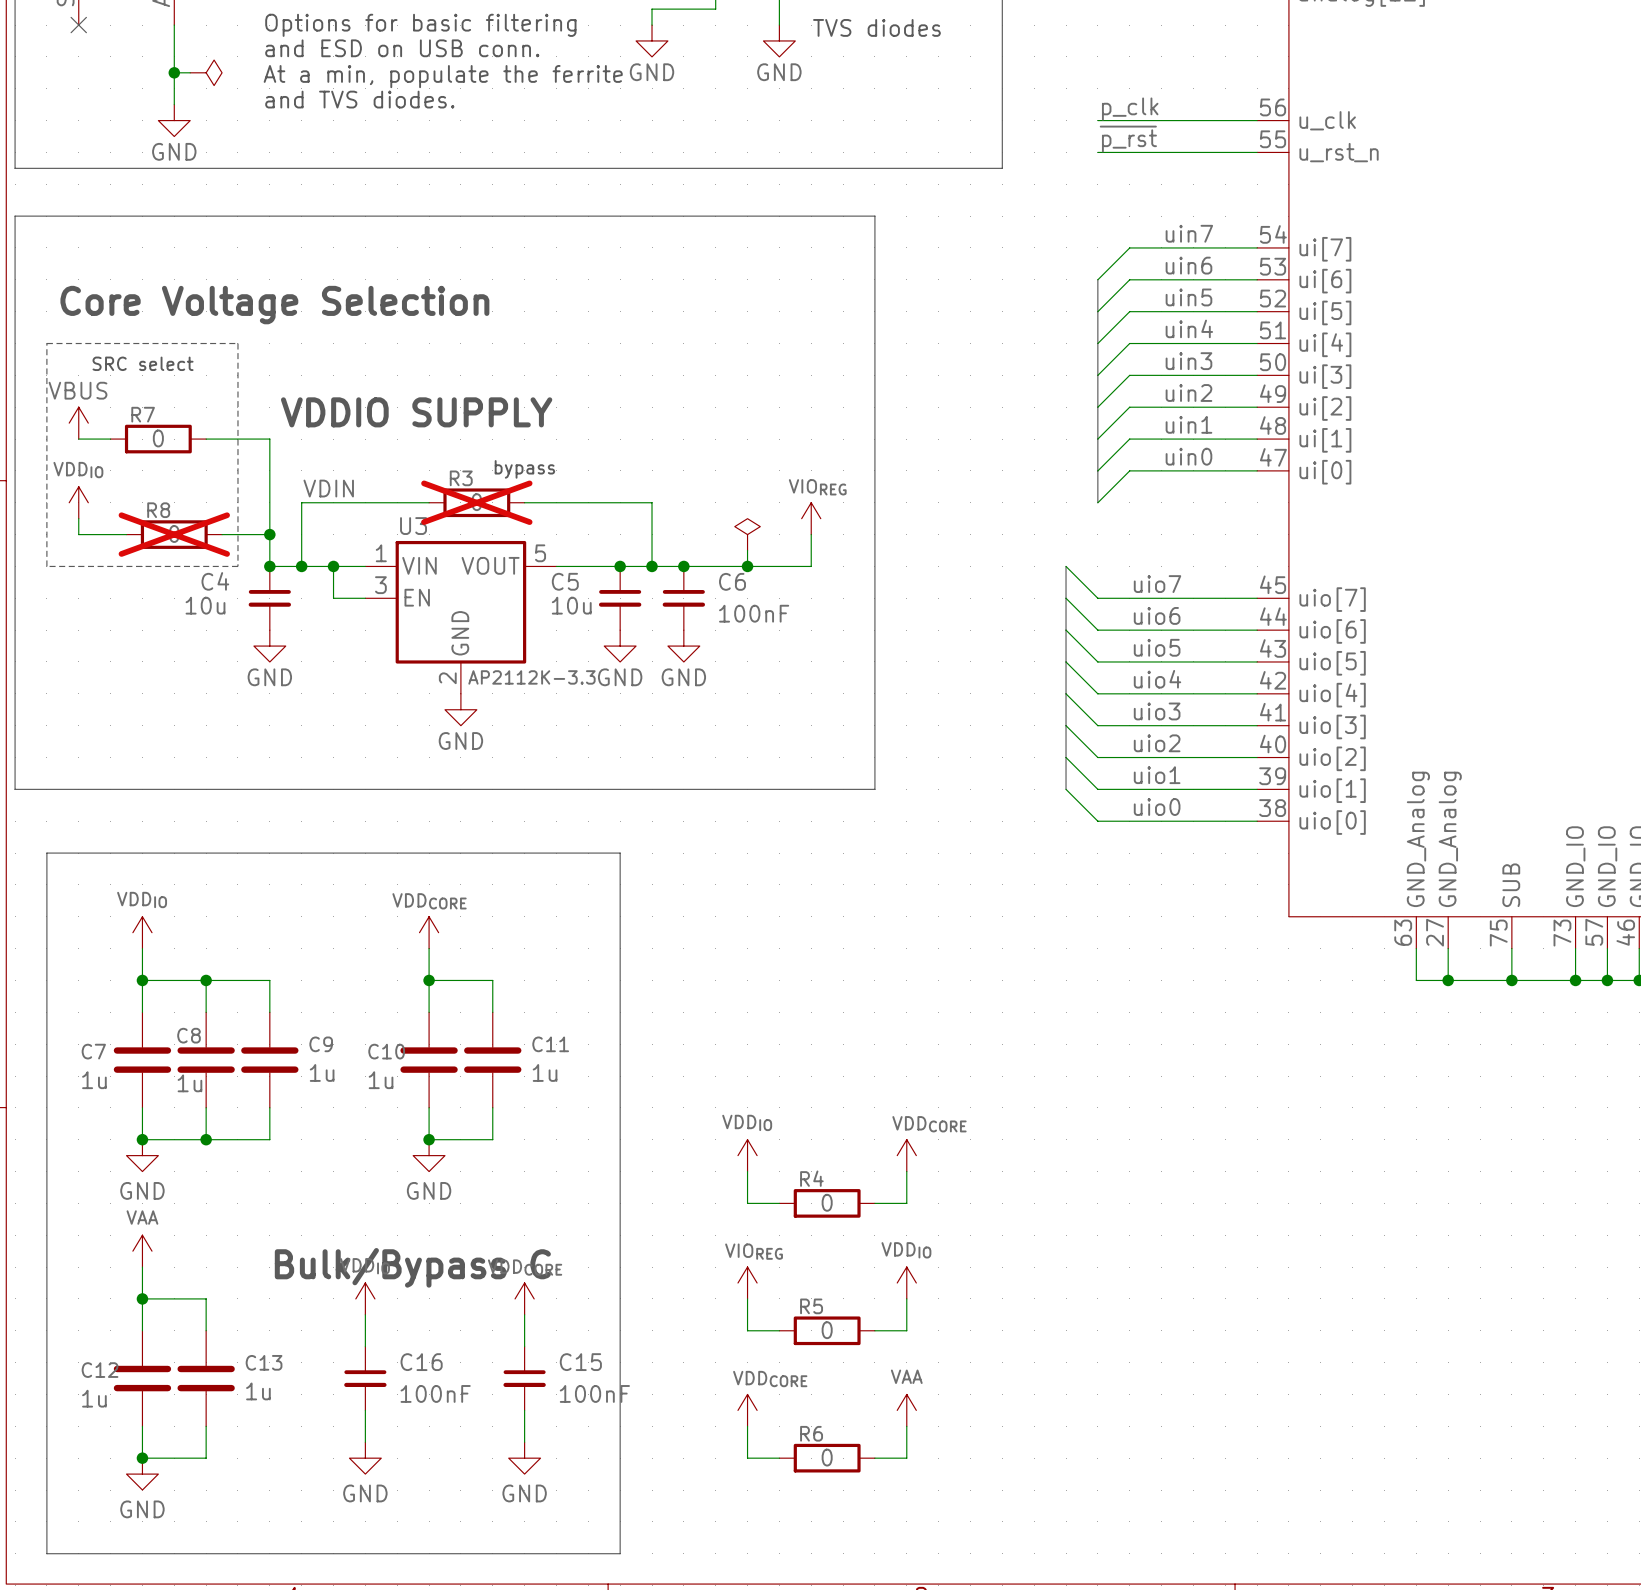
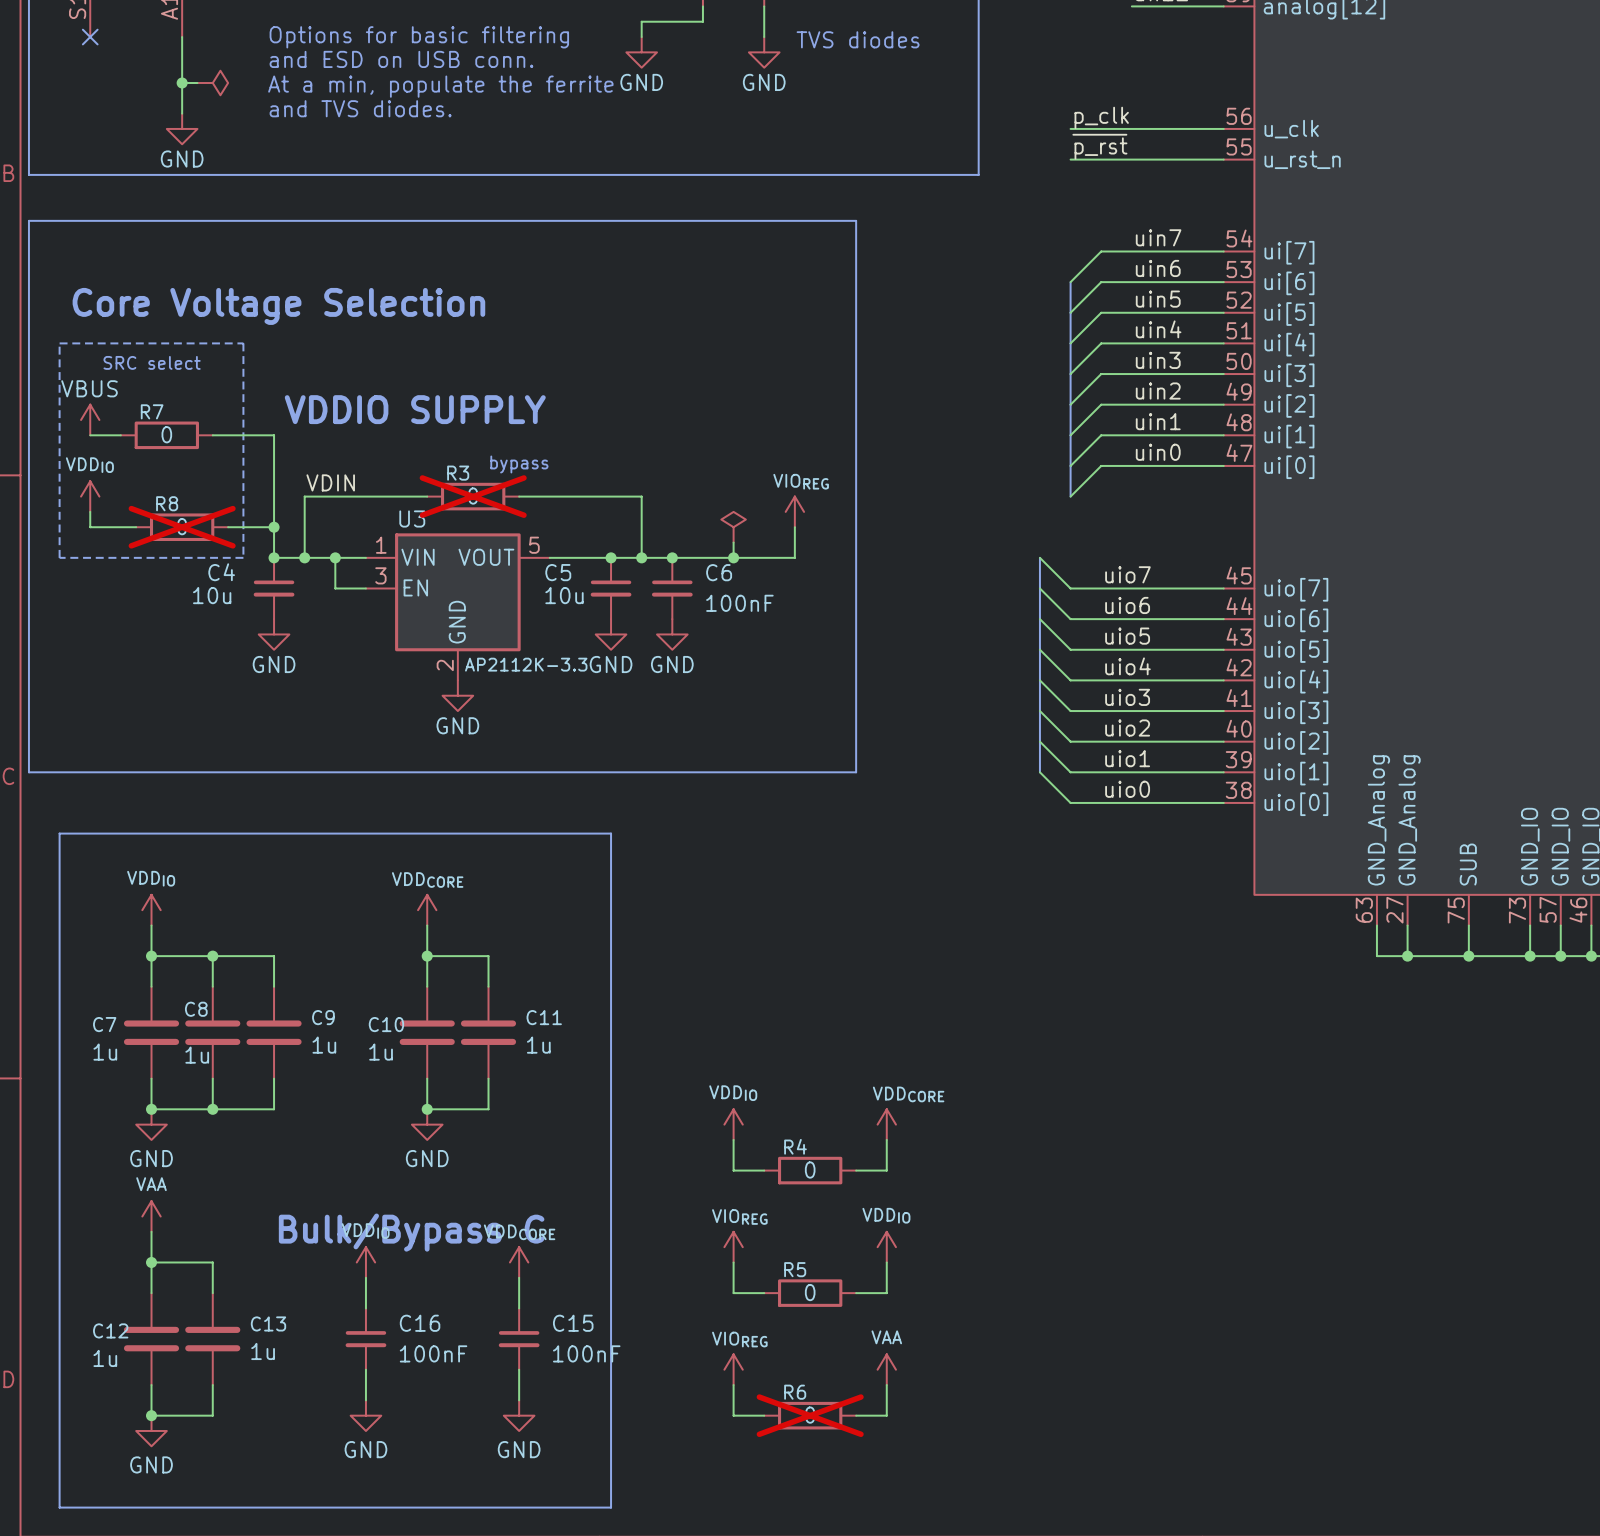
power symbol: VDDCORE (747, 1410) -> VIOREG (733, 1369)
R6 do-not-place cross: none -> (810, 1415)

